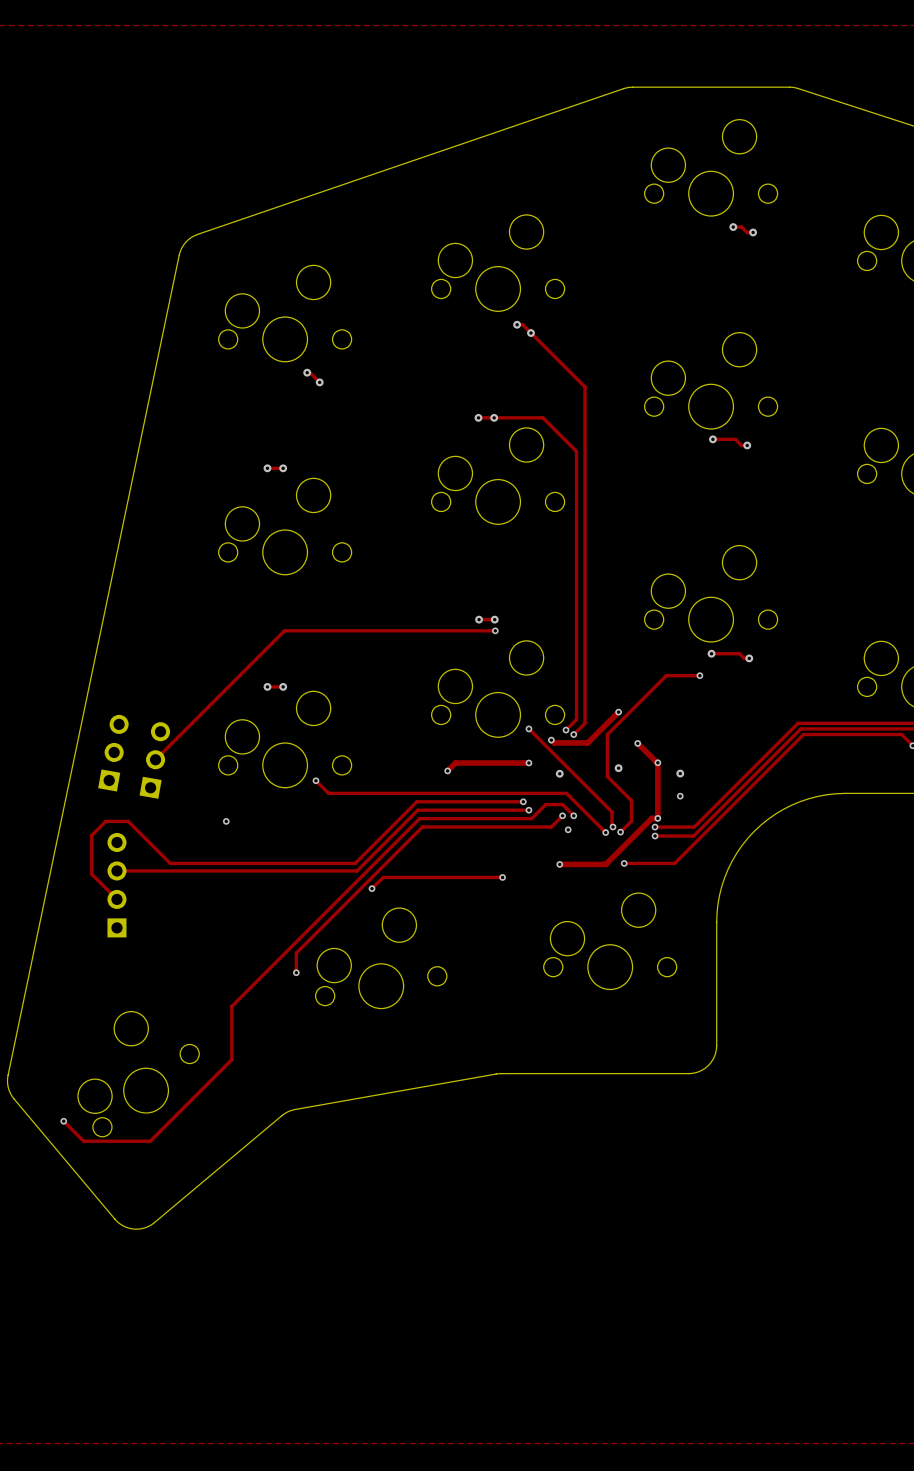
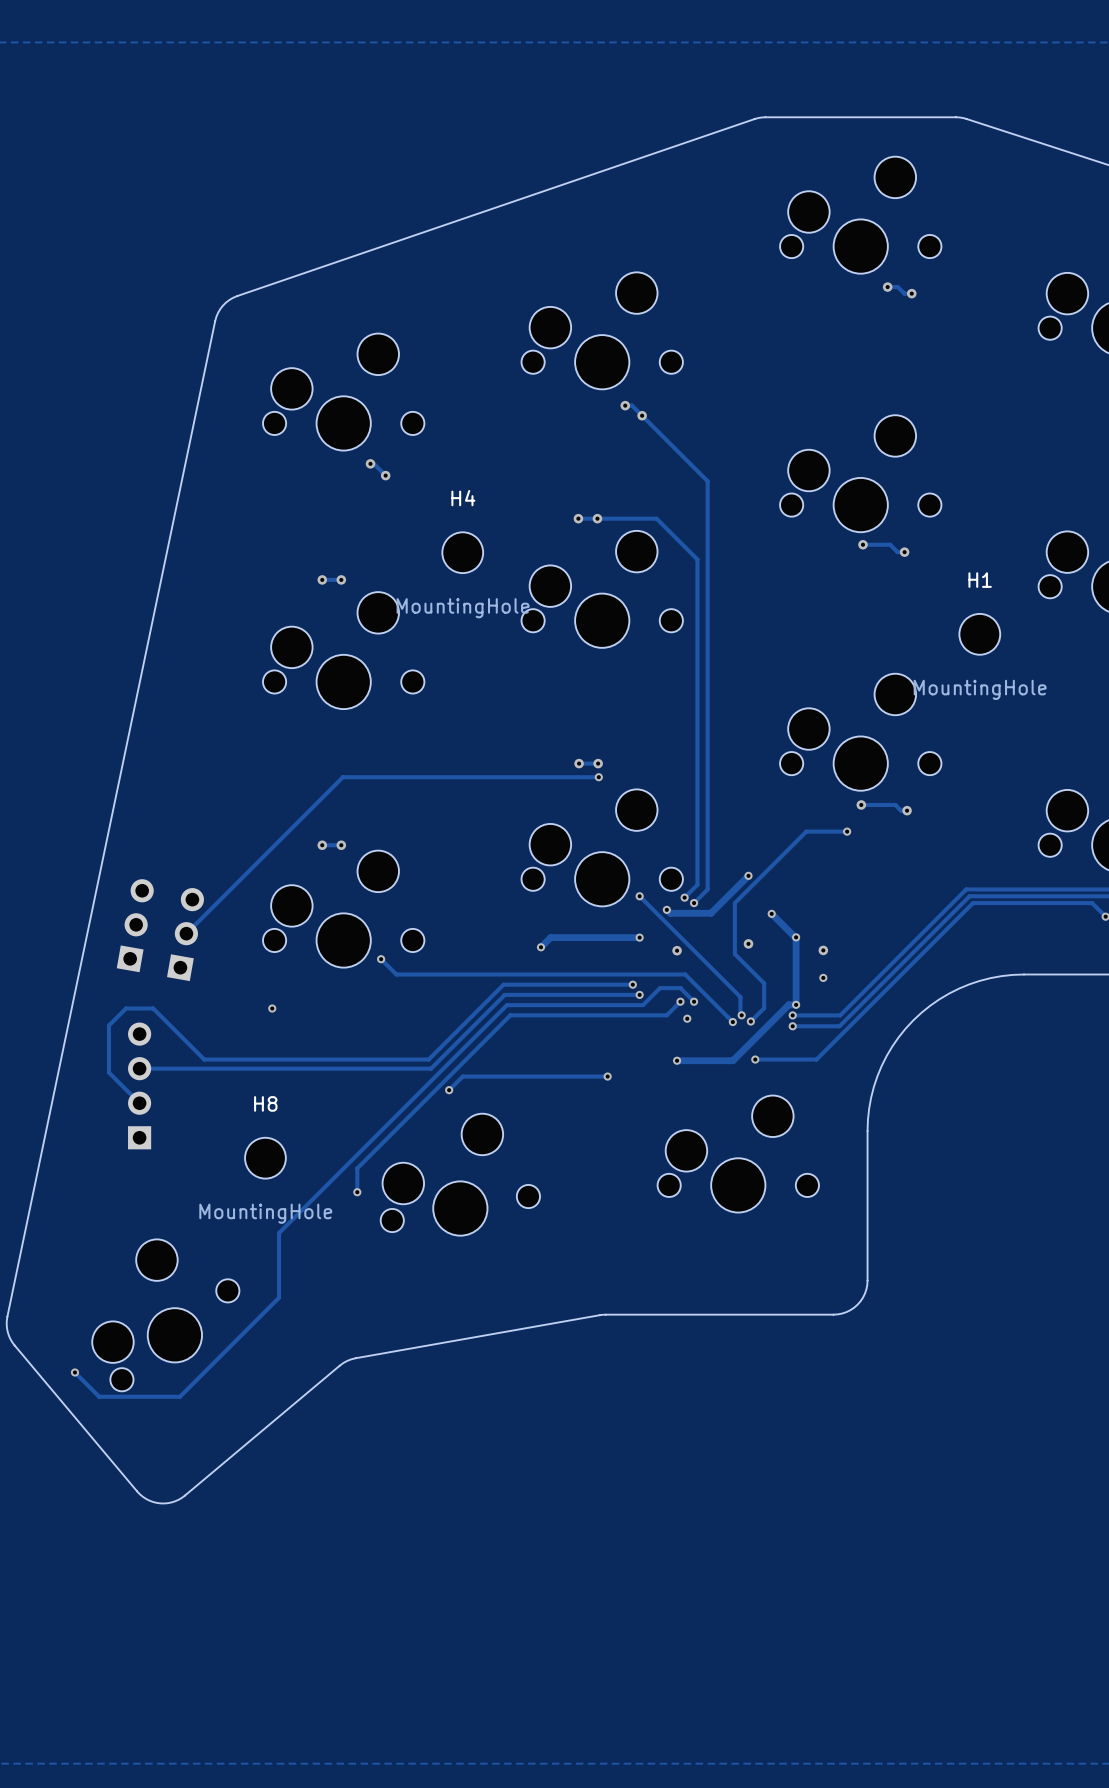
H4: none -> MountingHole (462, 552)
H1: none -> MountingHole (979, 634)
H8: none -> MountingHole (265, 1158)

